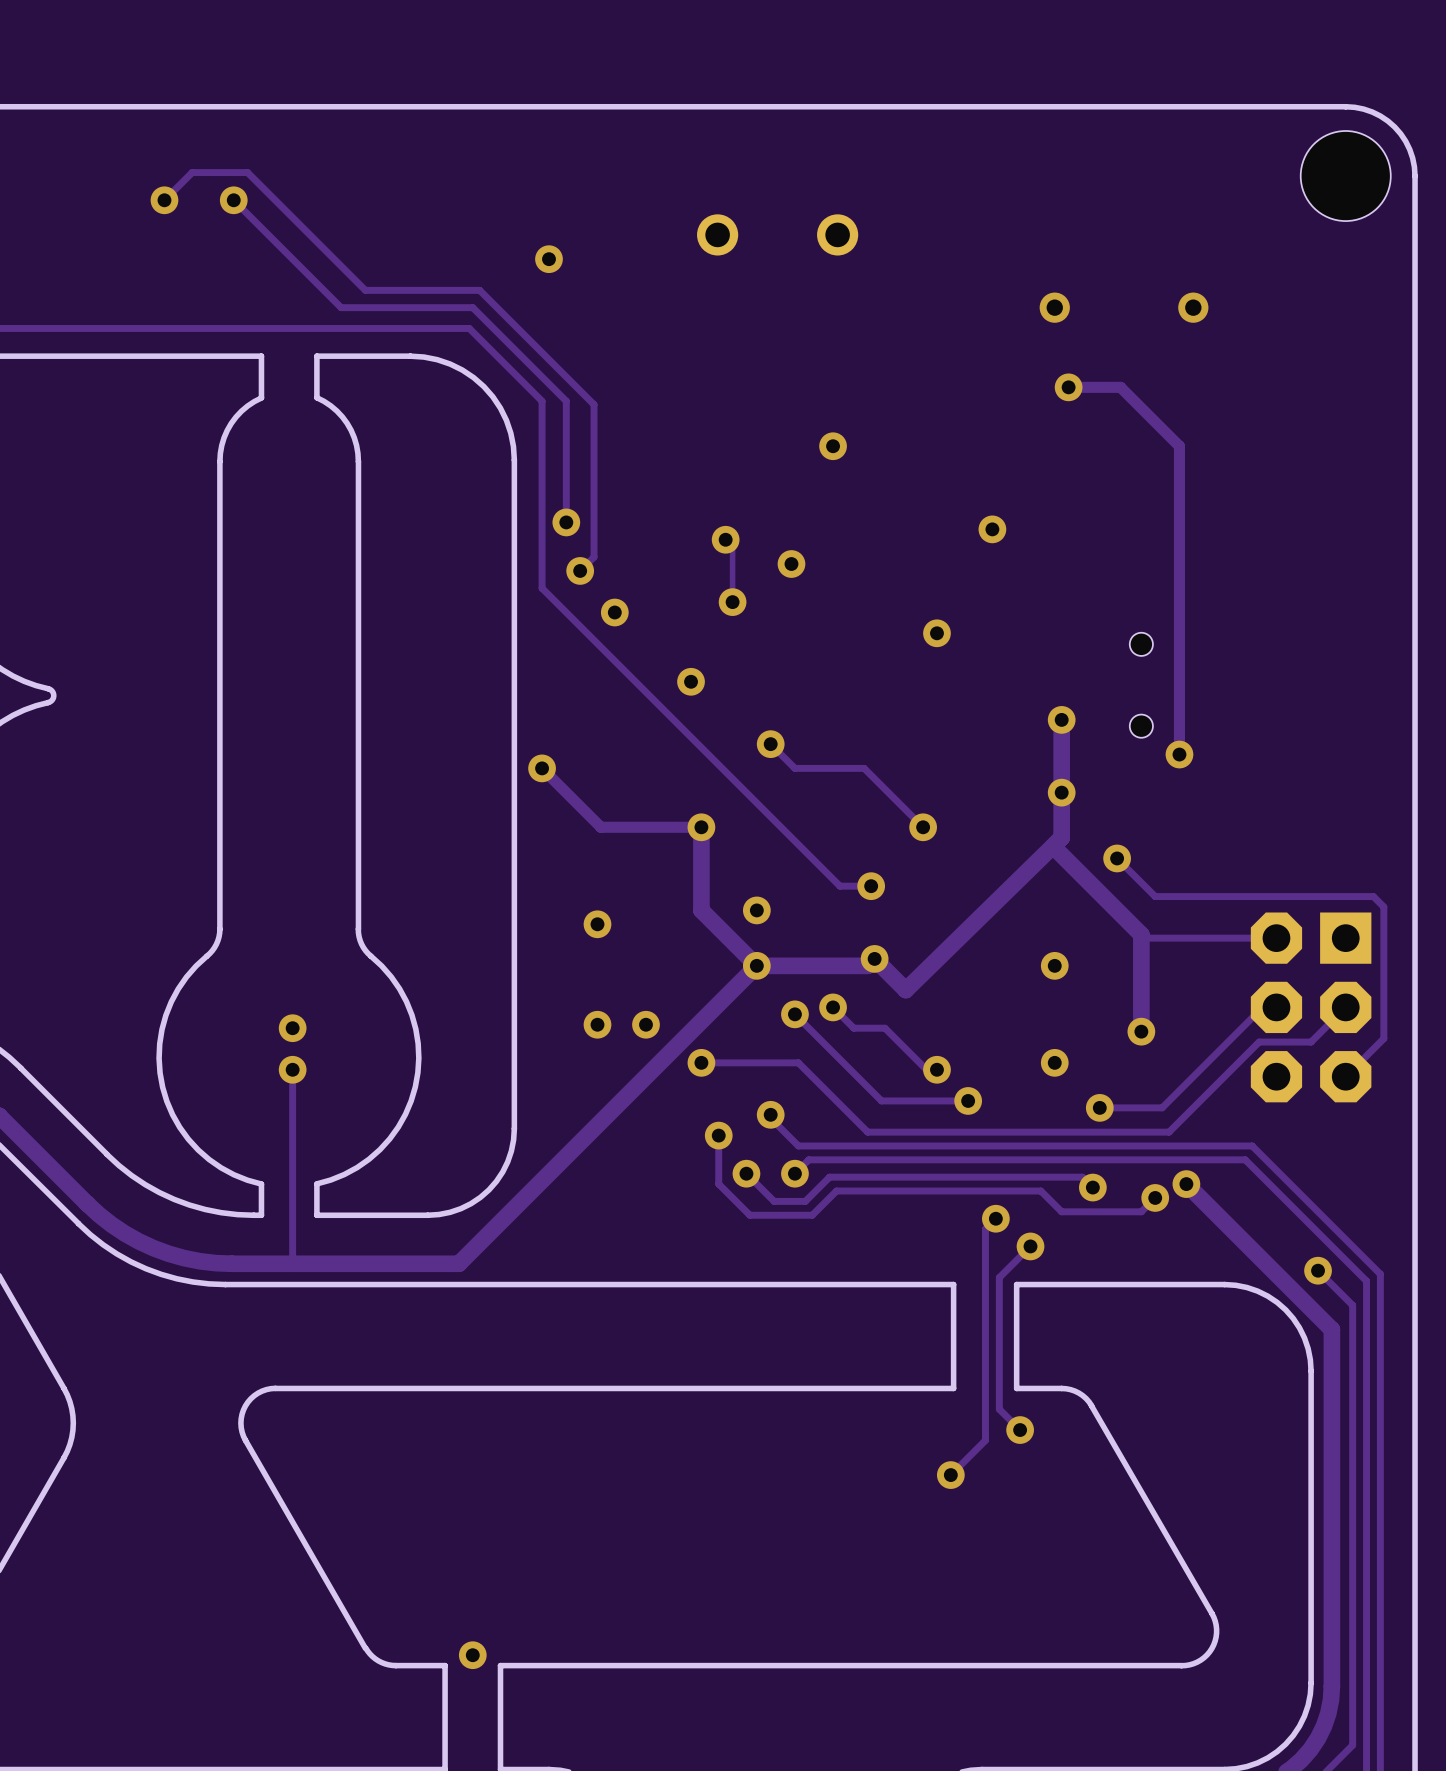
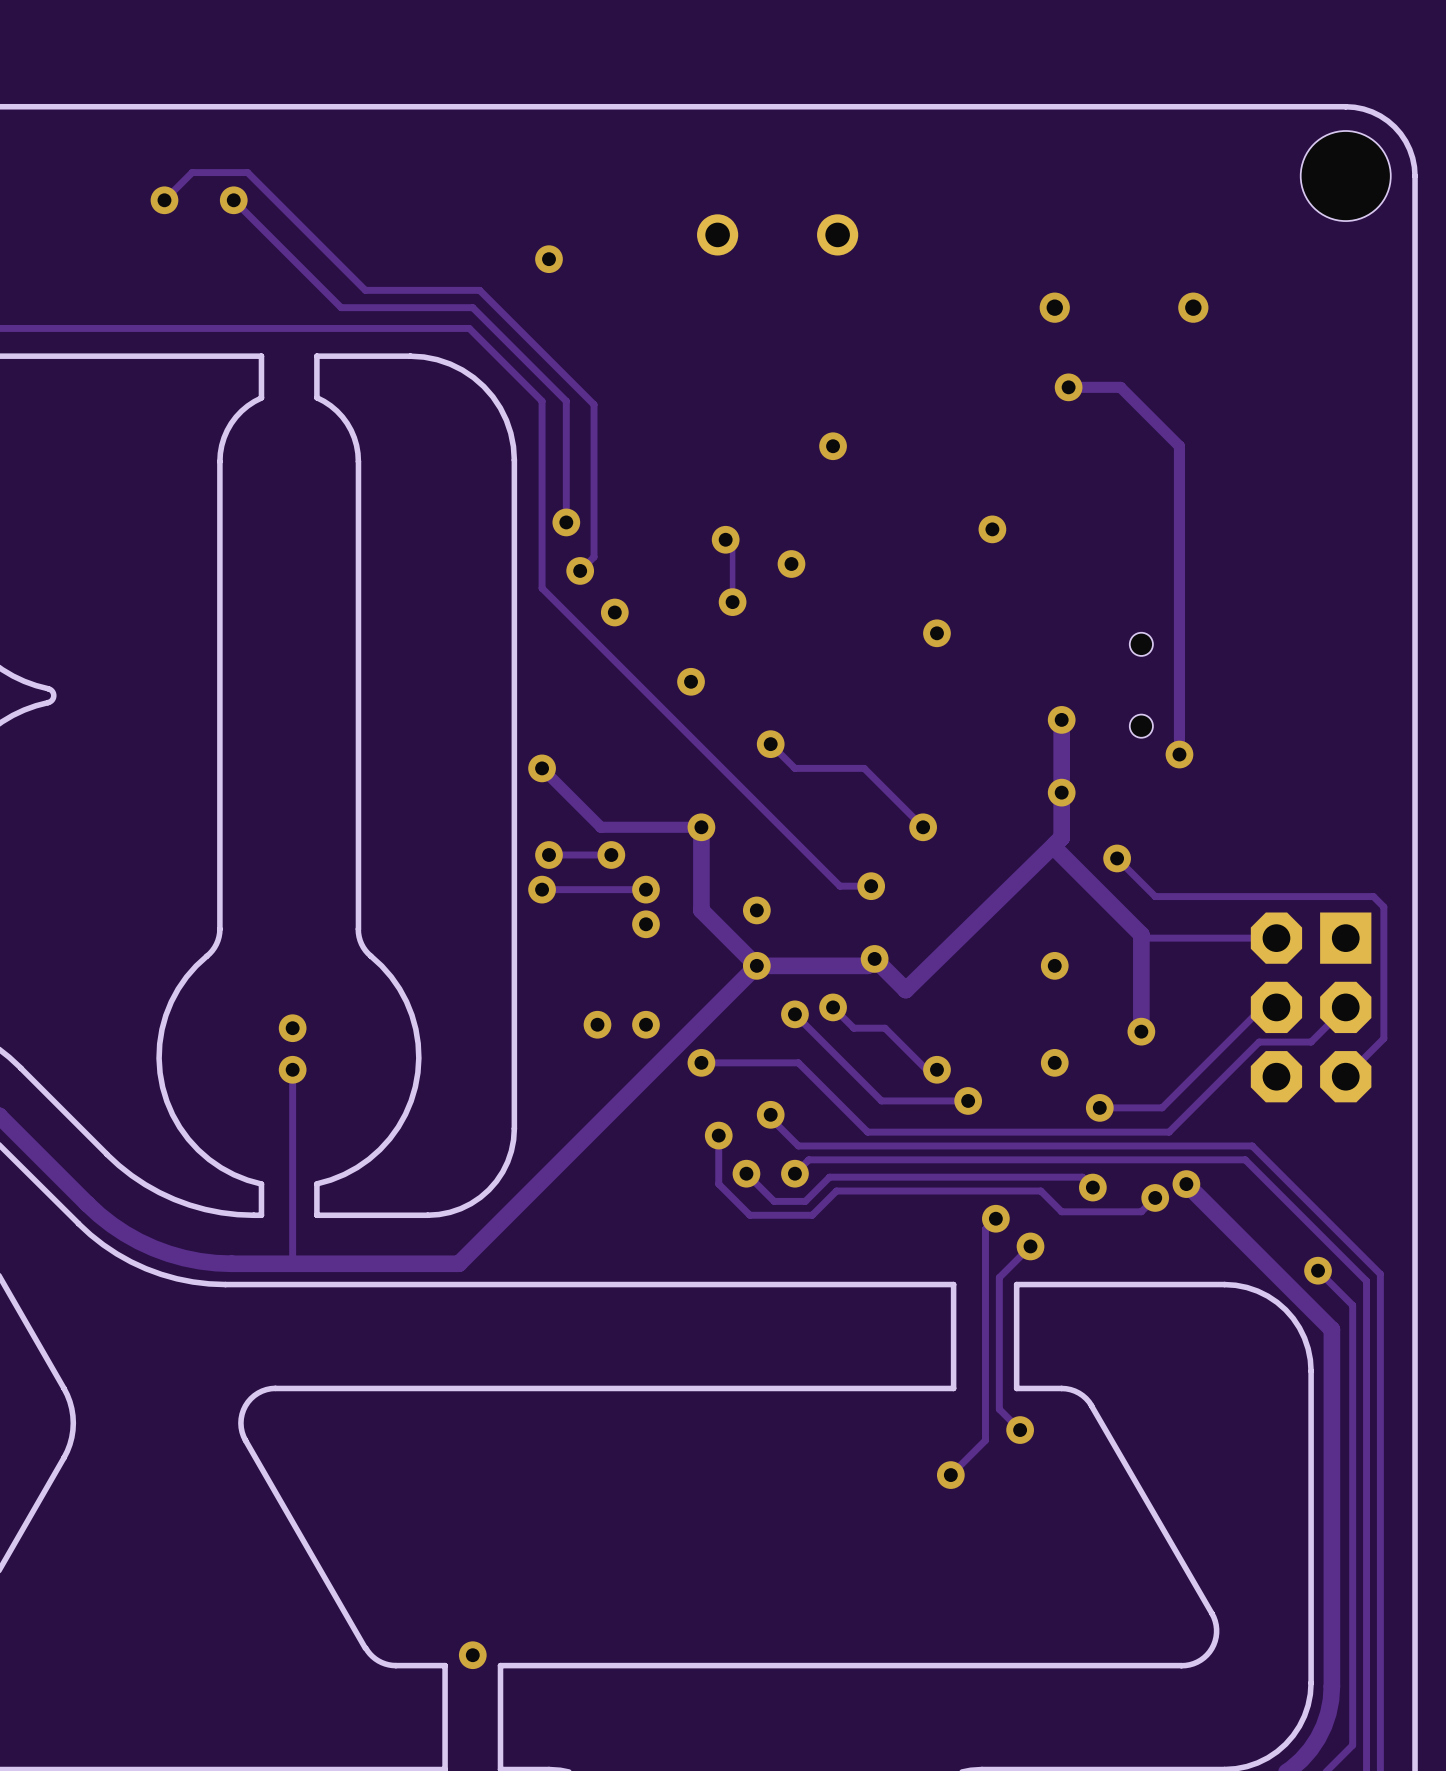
via: none -> (548, 855)
track: none -> (611, 855) (548, 855)
via: none -> (611, 855)
via: none -> (542, 889)
track: none -> (645, 889) (542, 889)
via: none -> (645, 889)
via: (597, 924) -> none
via: none -> (645, 924)

